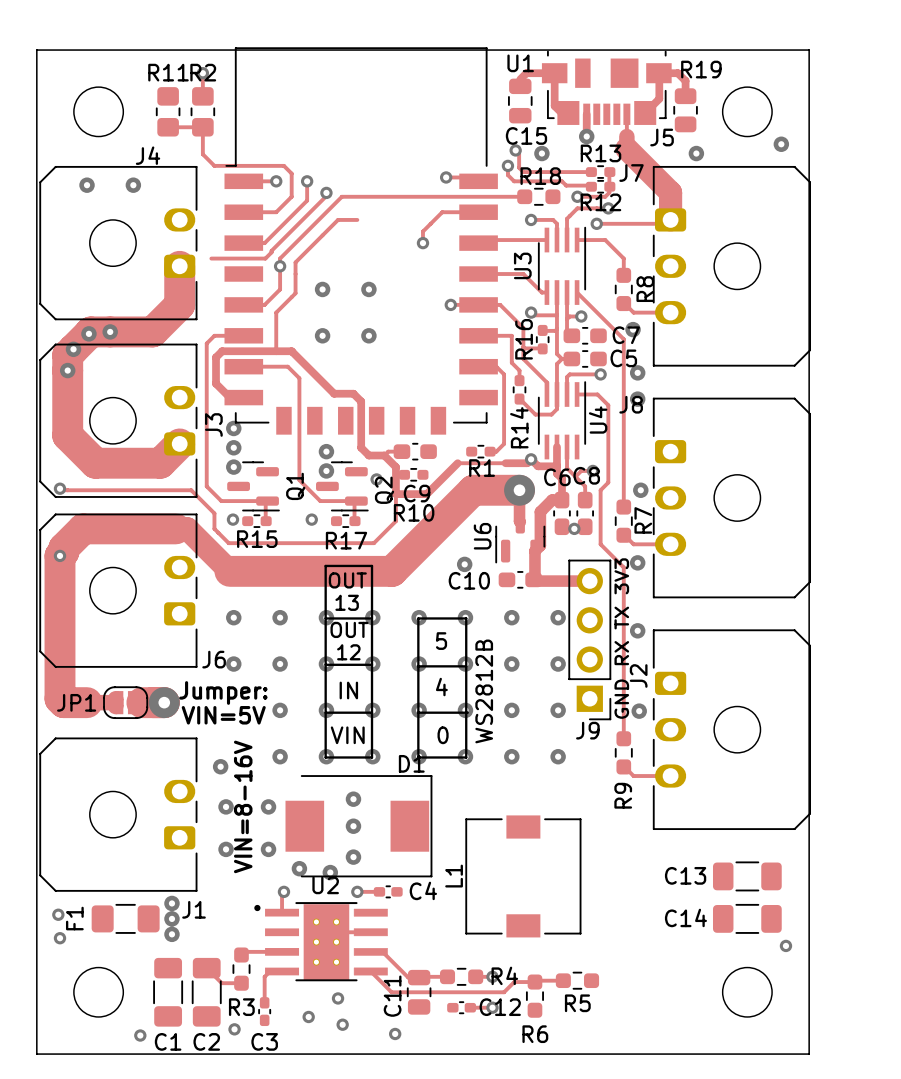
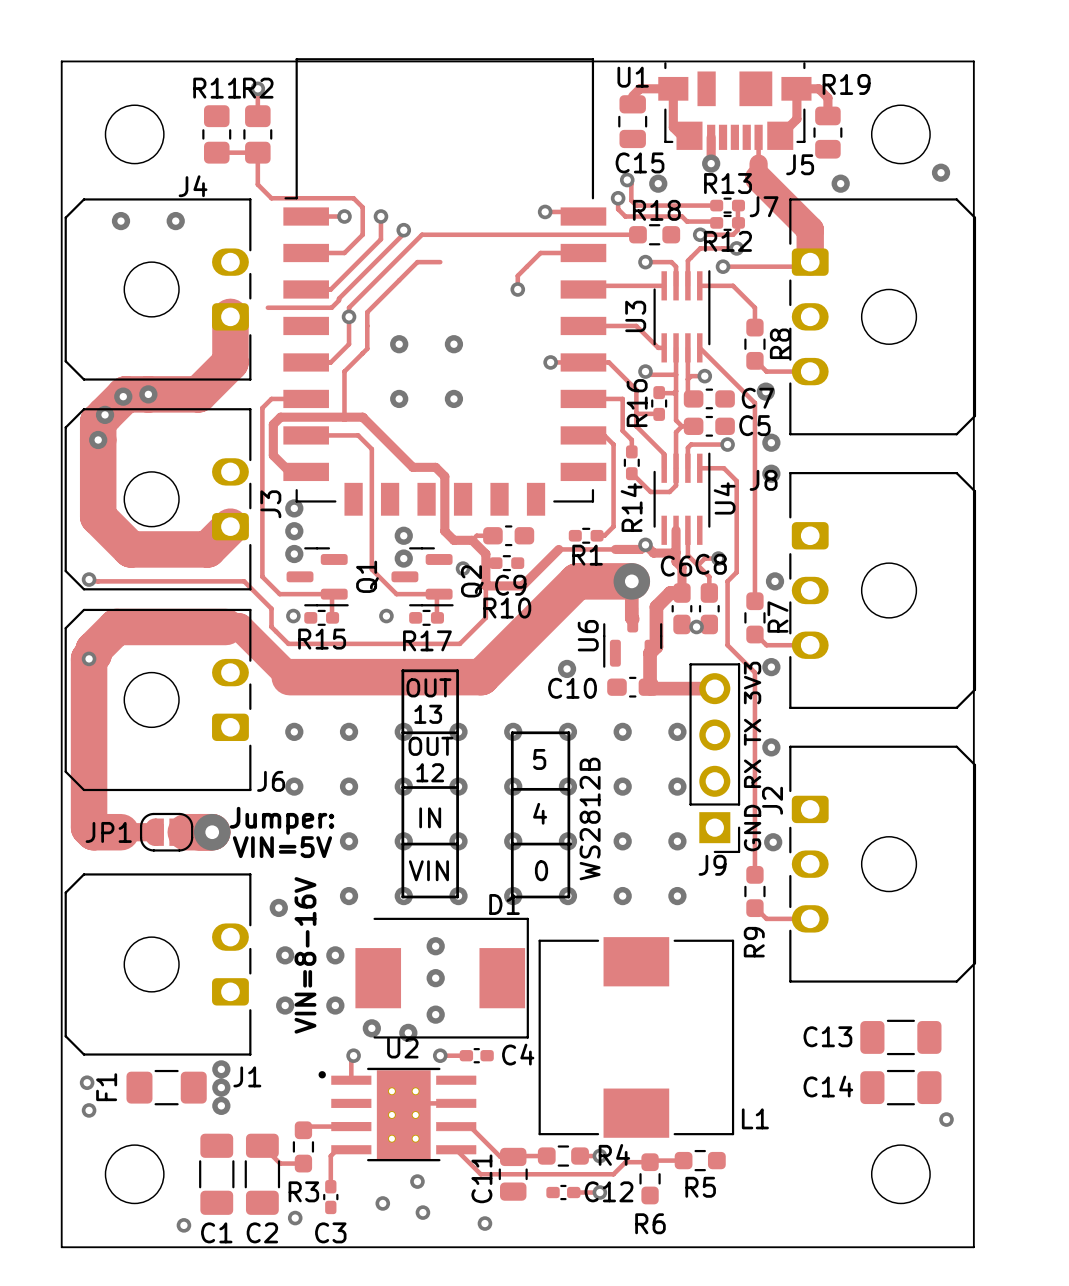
L1 footprint: [465, 815, 582, 938] -> [538, 937, 735, 1138]
L1 name position: L1 (454, 876) -> L1 (755, 1118)

